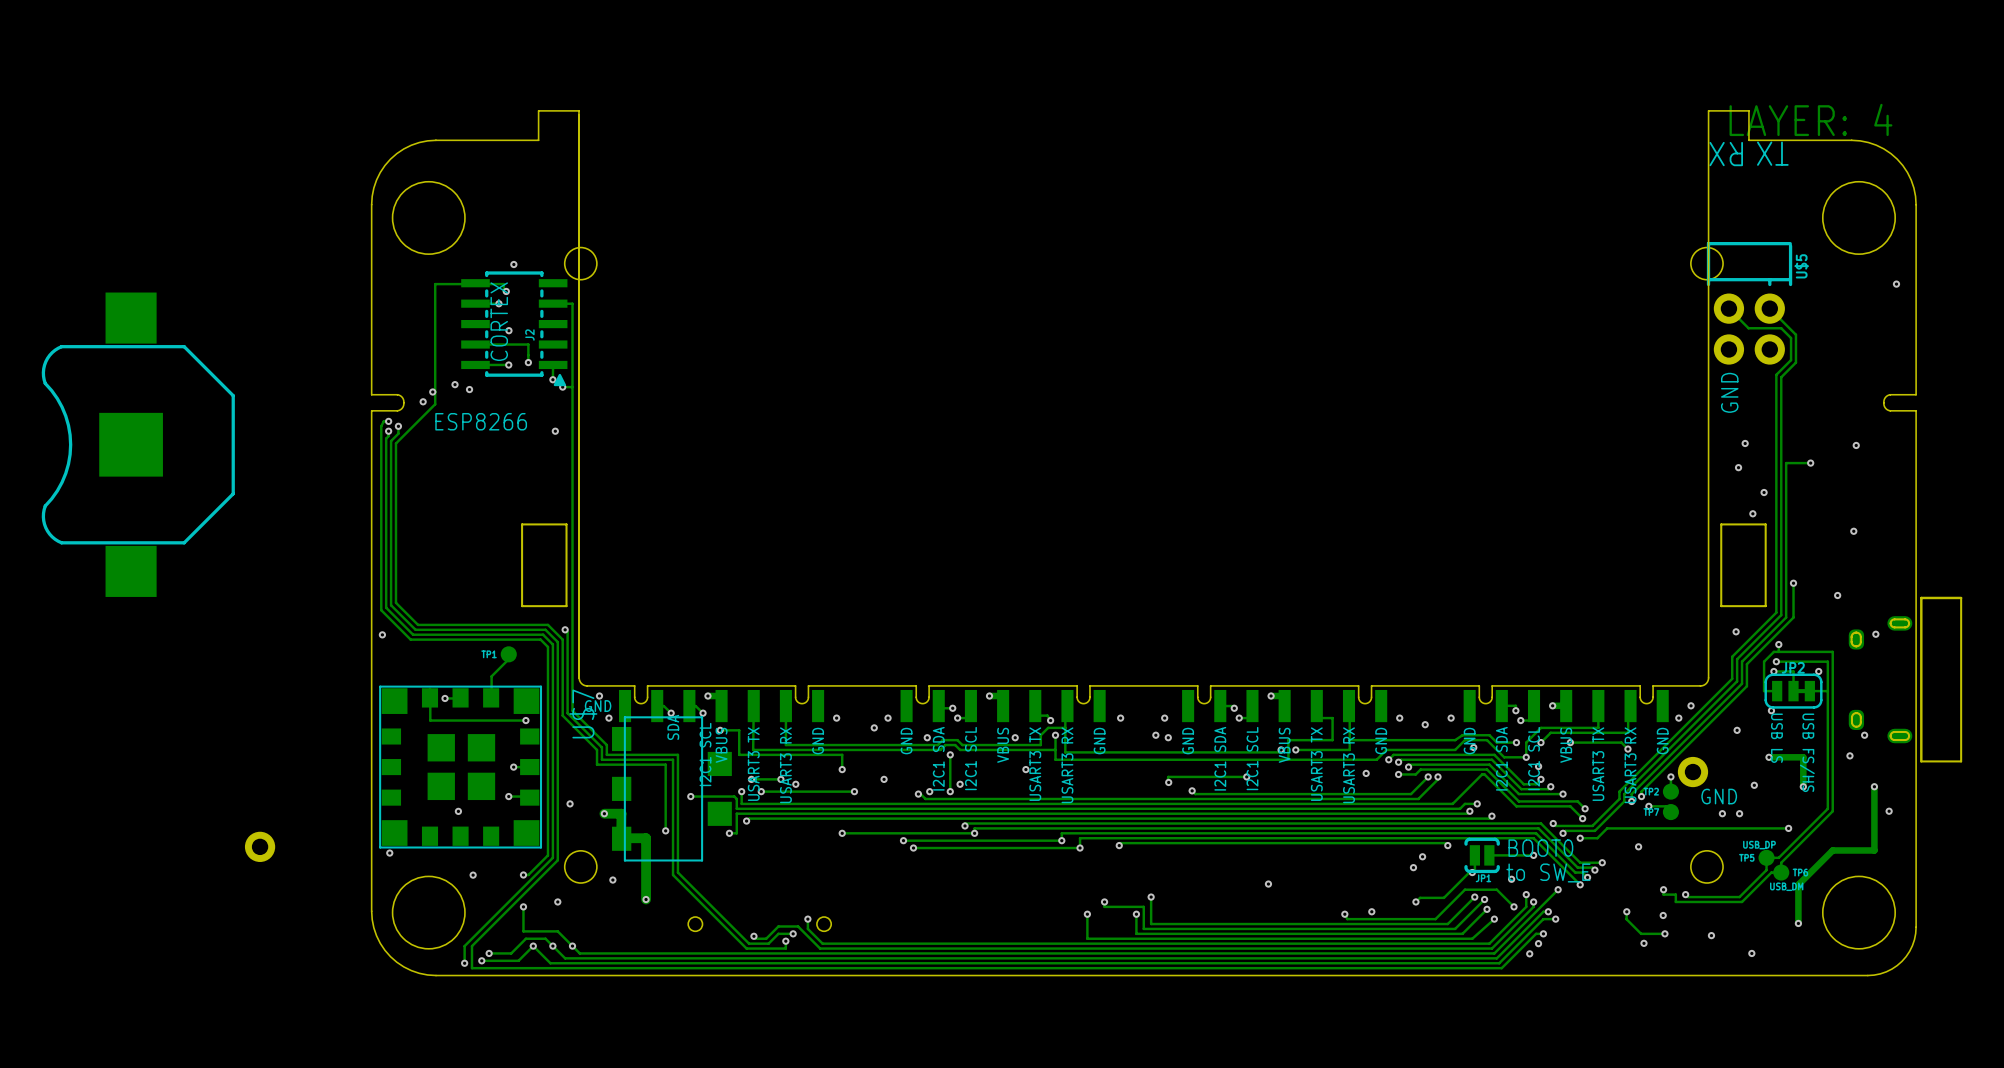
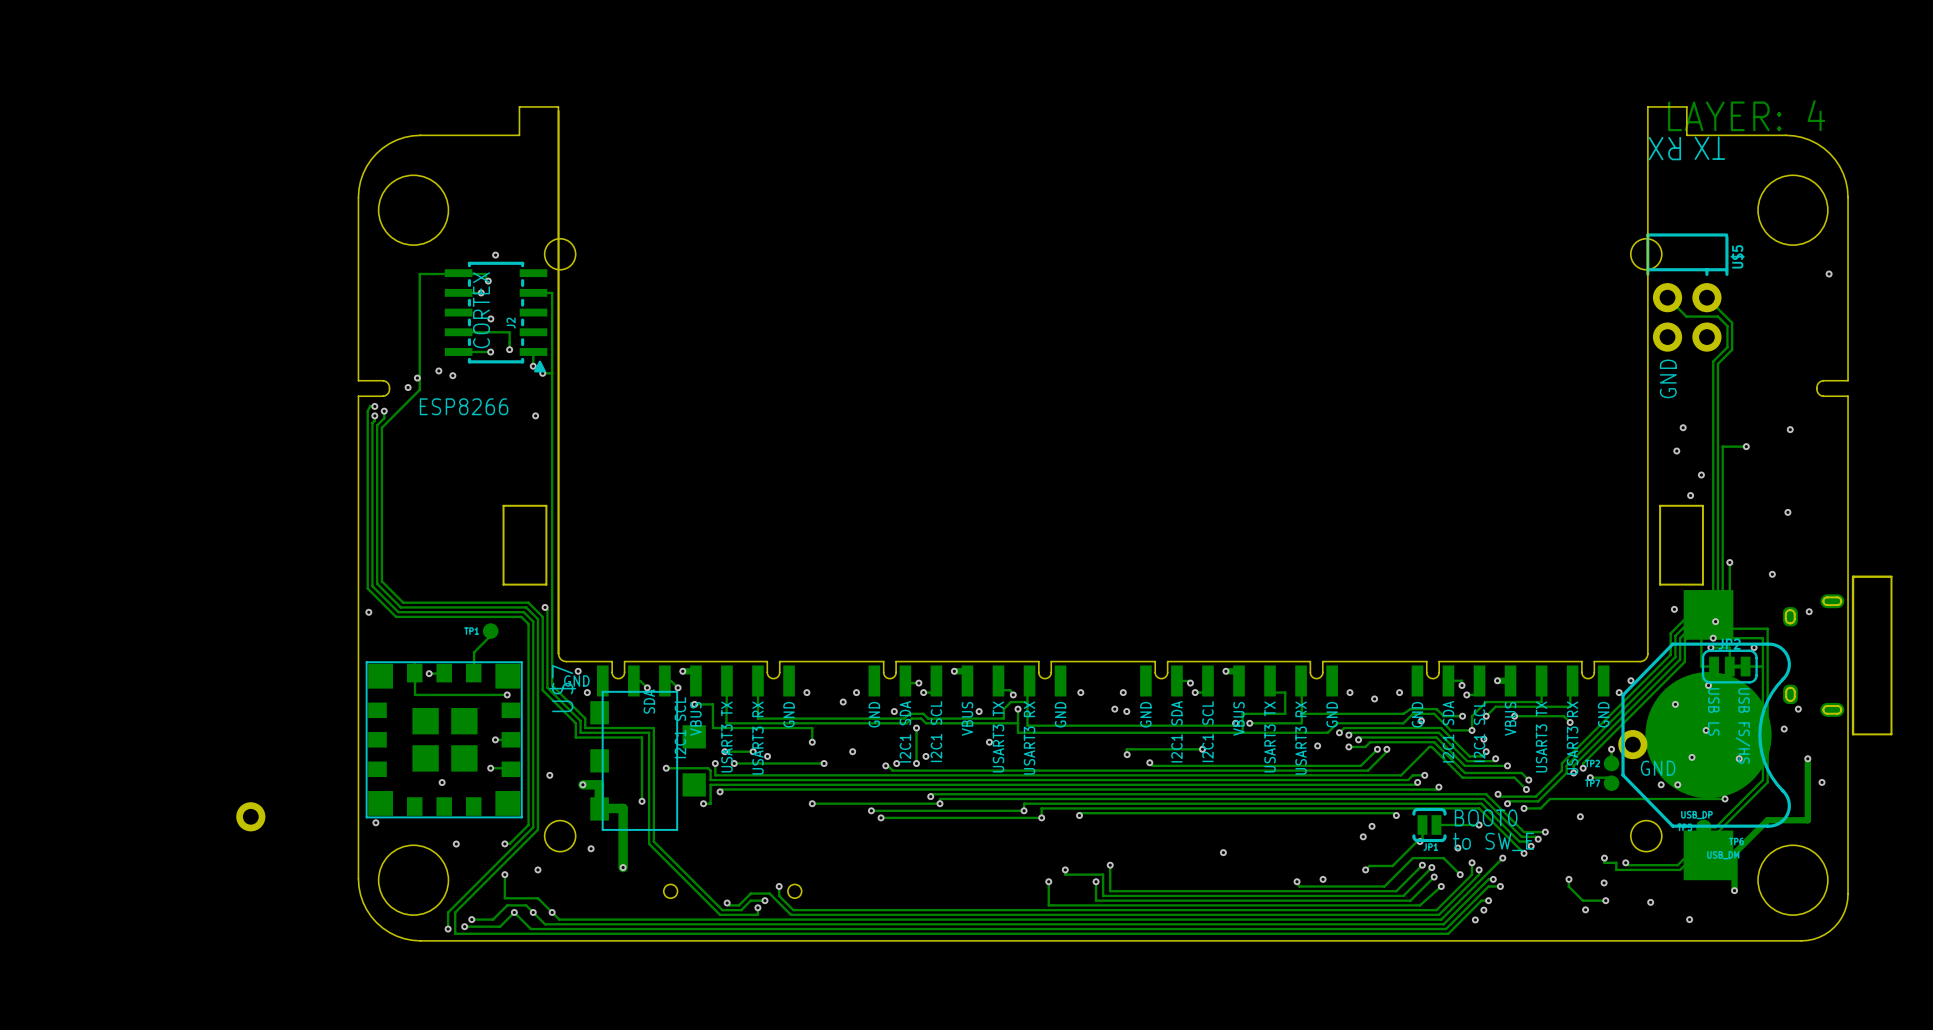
part: (138, 444) -> none
part: none -> (1706, 735)

